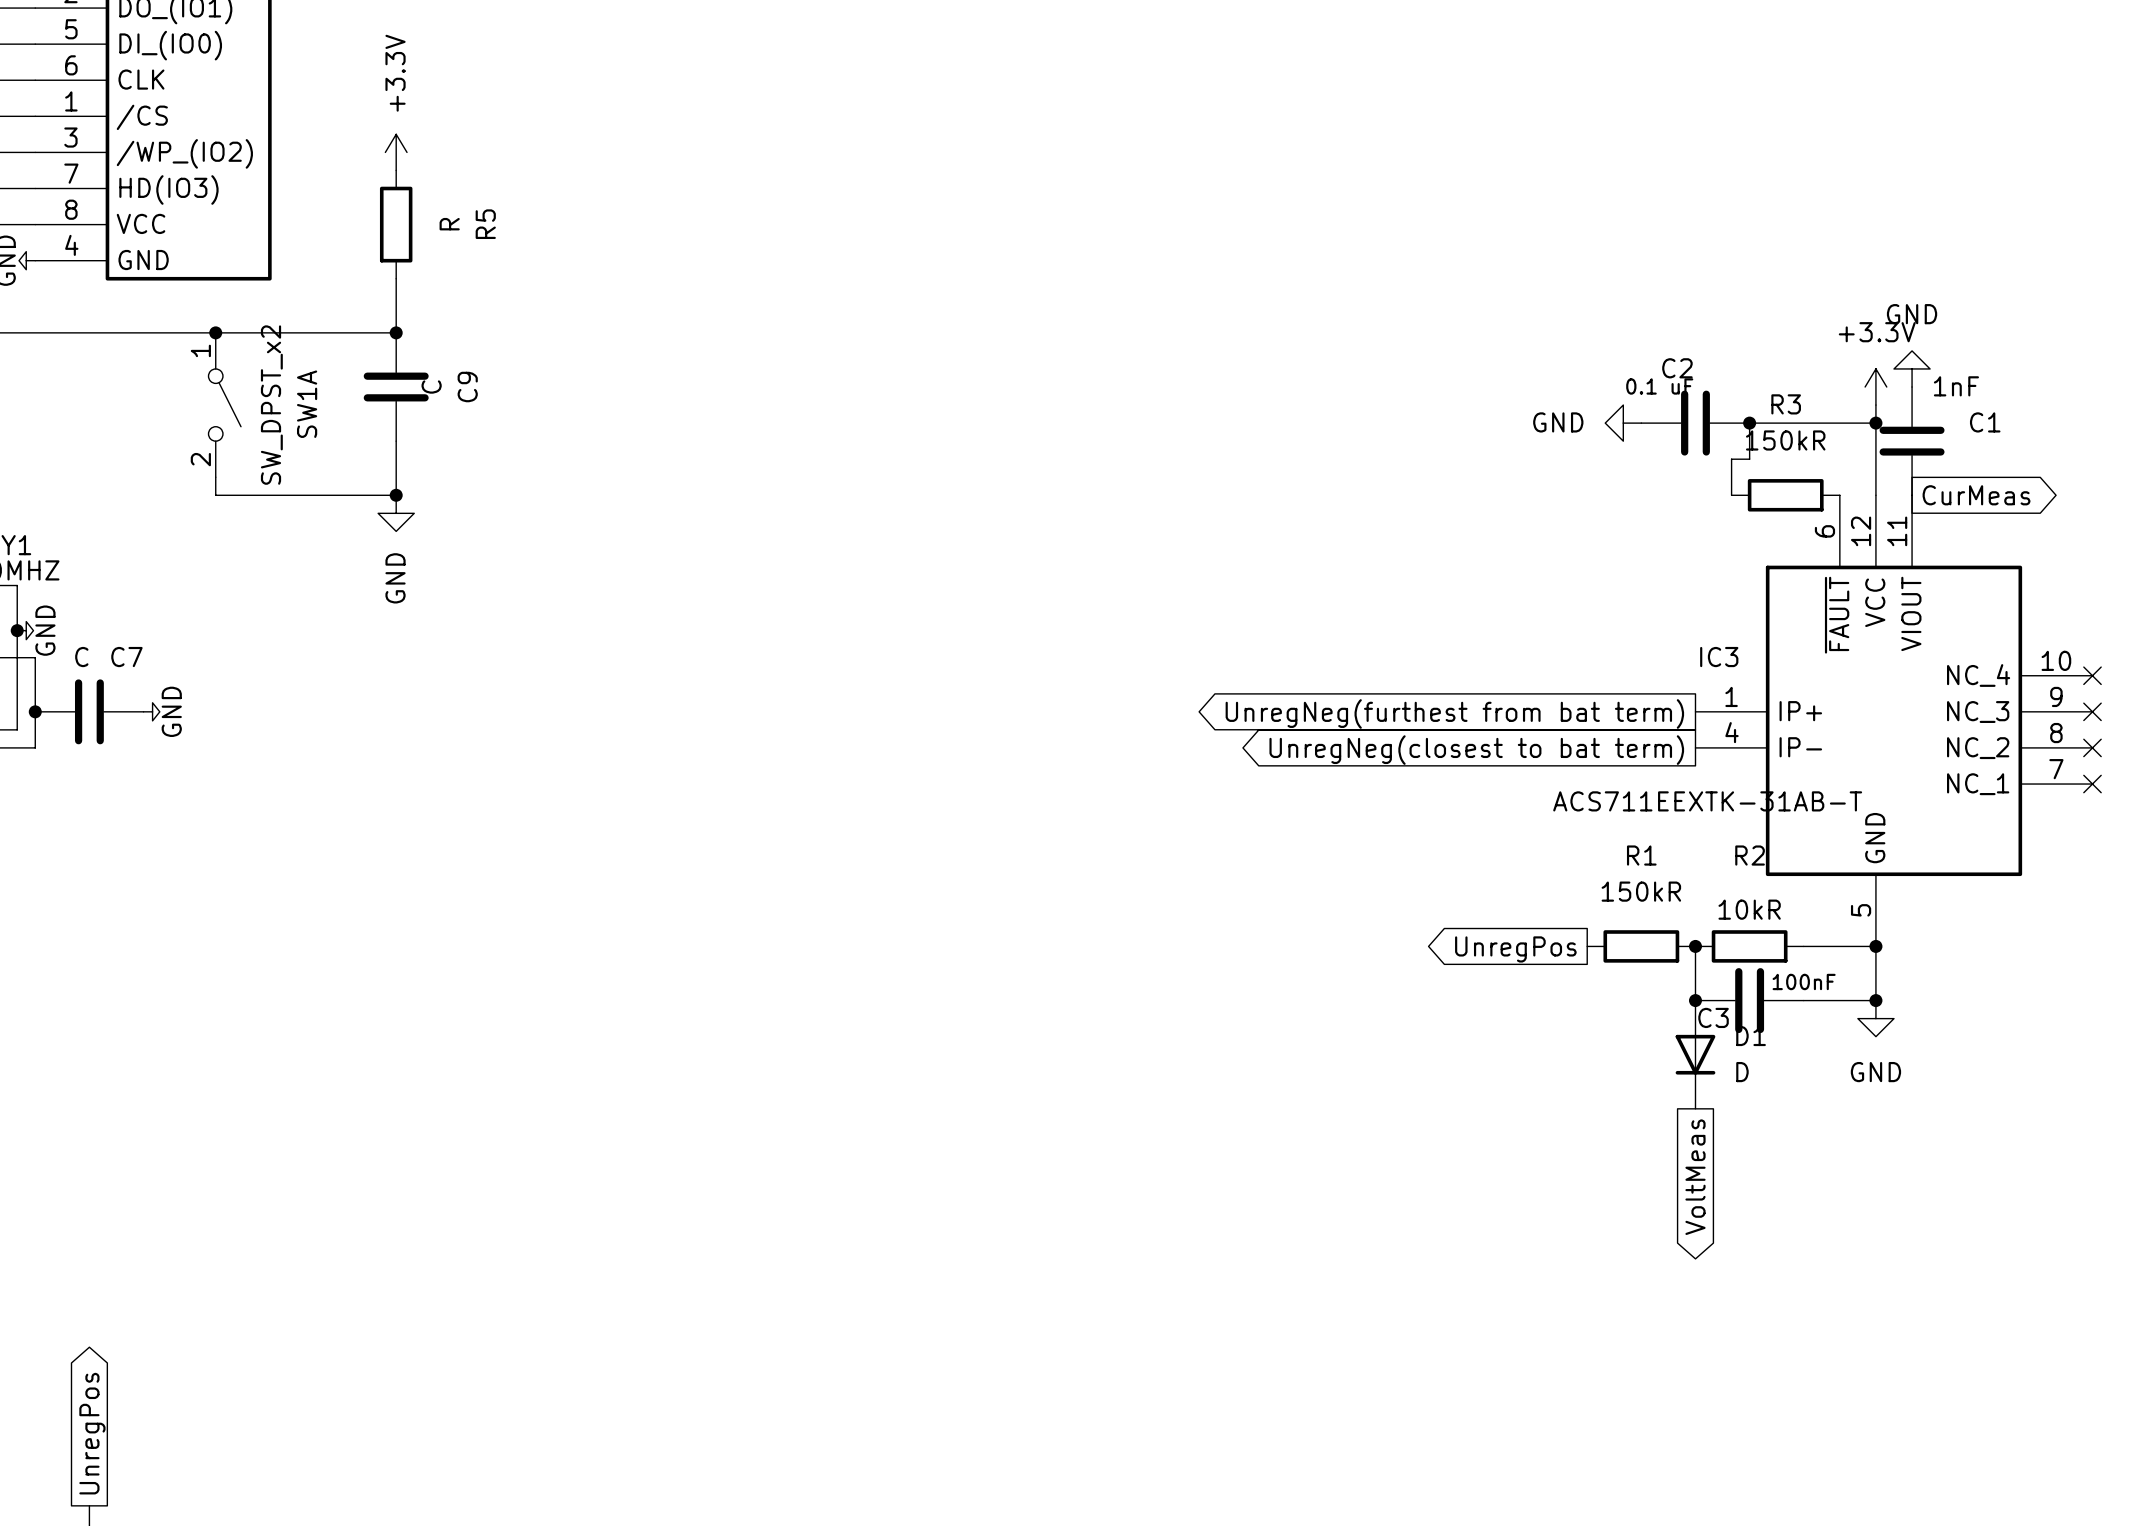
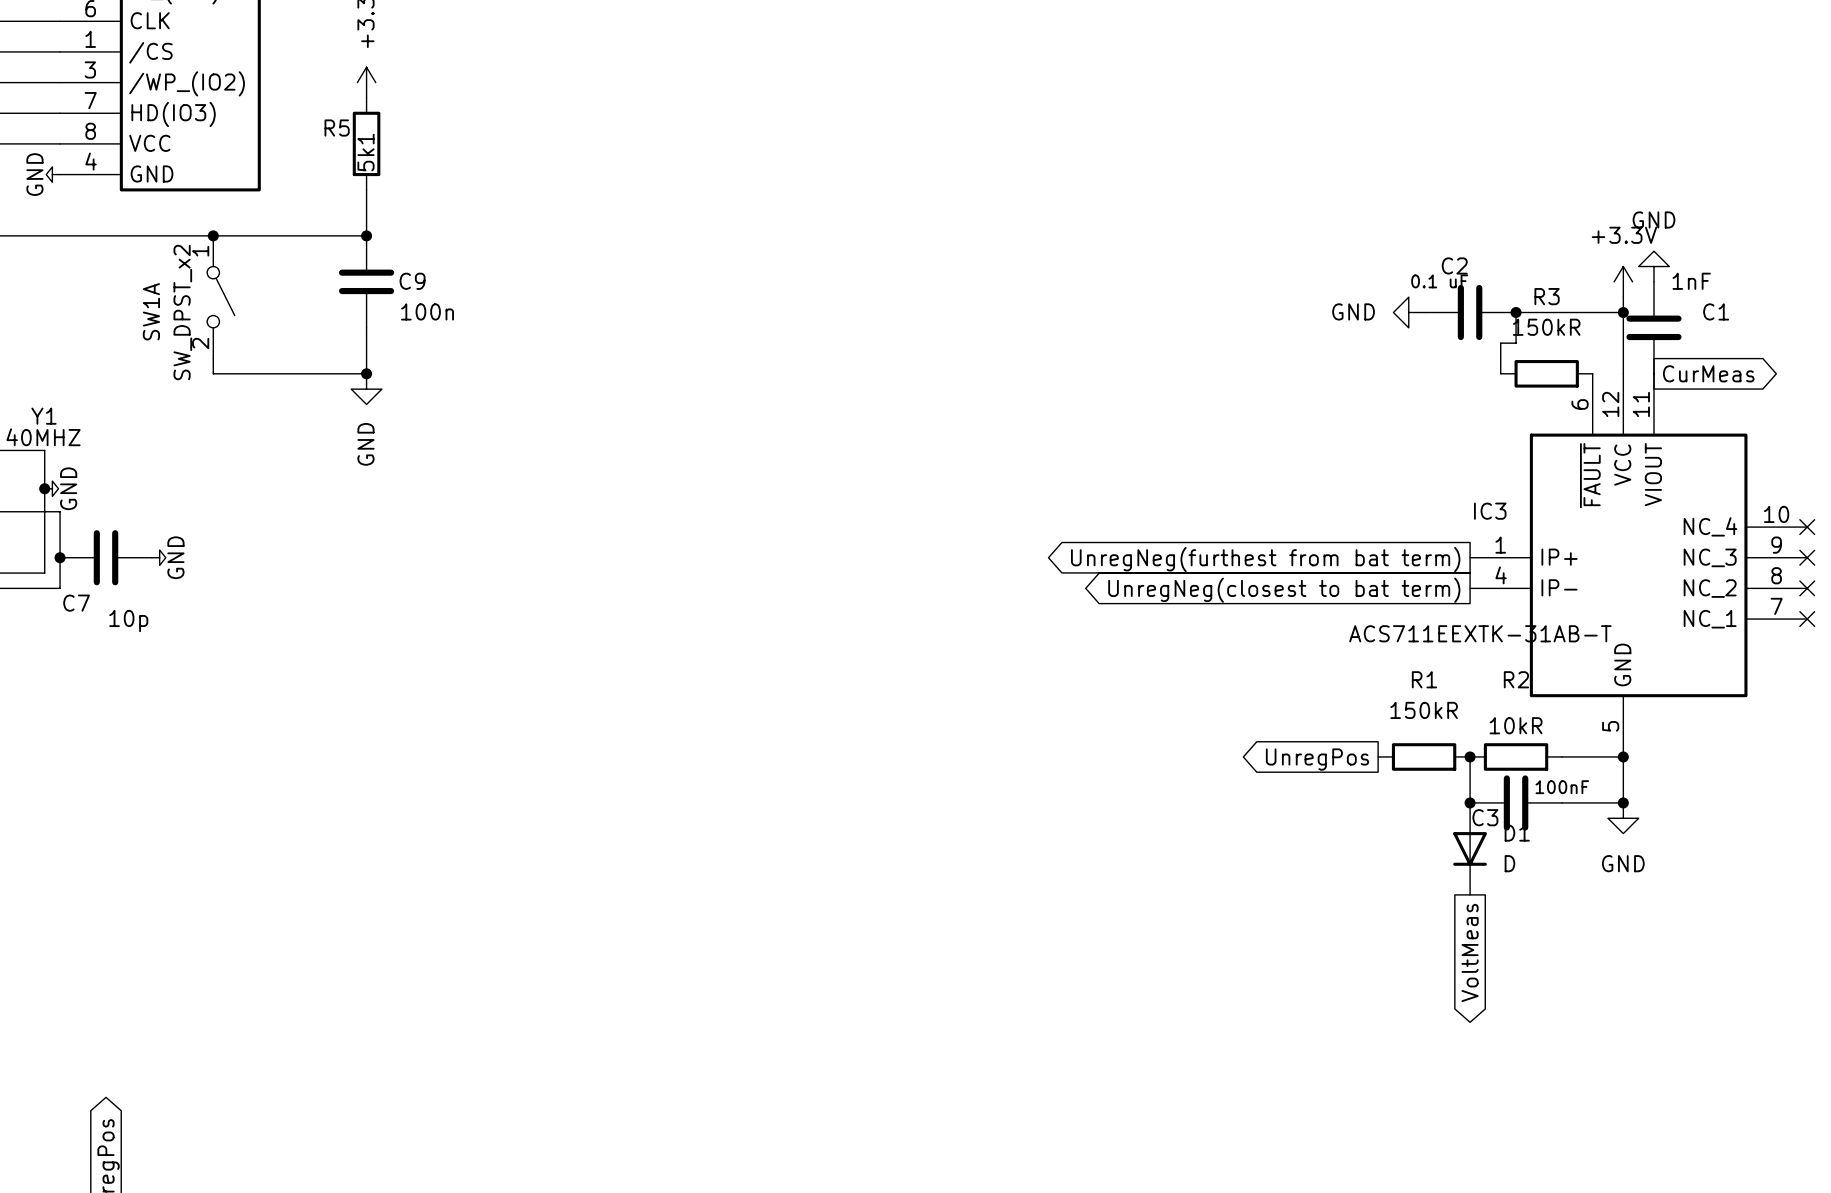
R5 value: R (449, 224) -> 5k1 (365, 152)
R5 name rotation: 0° (485, 224) -> 90° clockwise (337, 128)
R5 name position: R5 (485, 224) -> R5 (337, 128)
C9 value: C (431, 387) -> 100n (427, 311)
C9 name rotation: 0° (467, 387) -> 90° clockwise (412, 281)
SW1A name position: SW1A (307, 404) -> SW1A (151, 311)
SW1A value position: SW_DPST_x2 (271, 405) -> SW_DPST_x2 (182, 312)
C7 value: C (81, 657) -> 10p (128, 621)
C7 name position: C7 (126, 657) -> C7 (76, 603)

